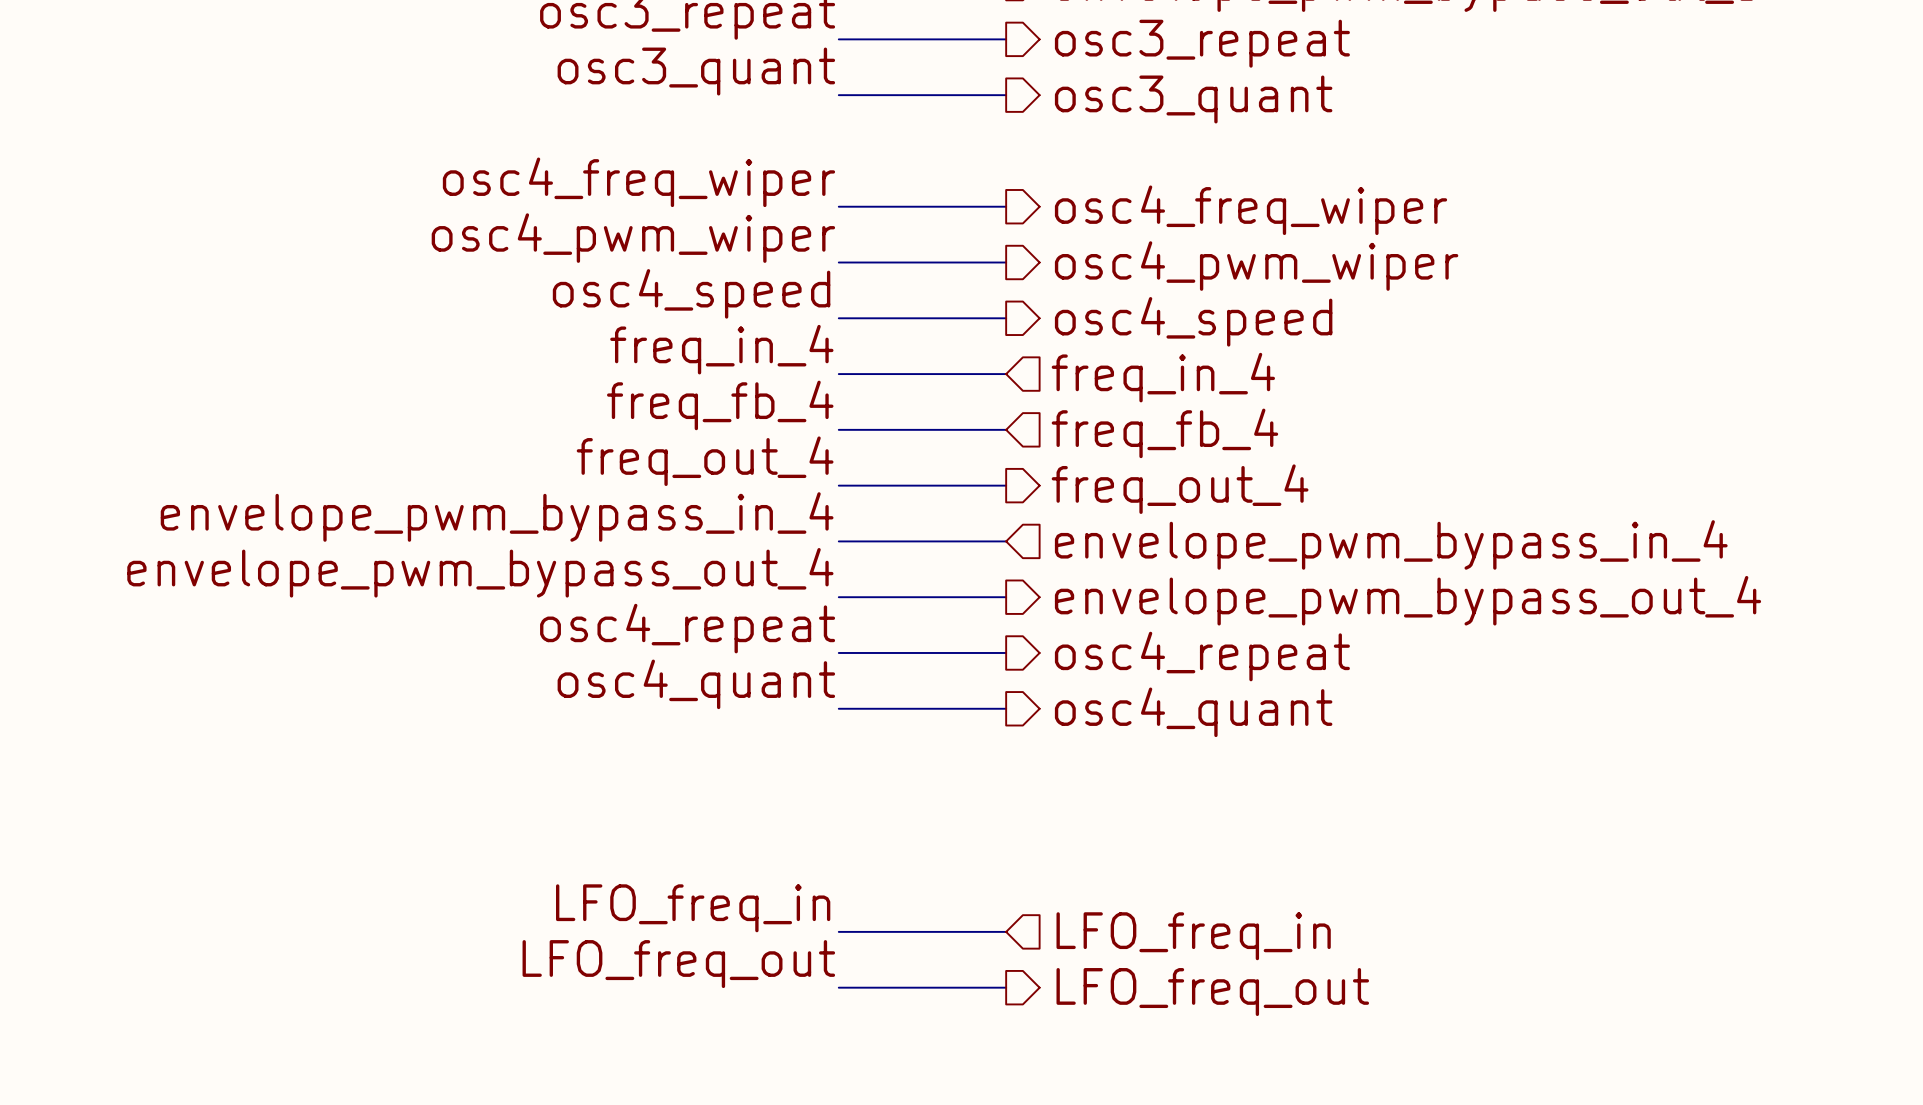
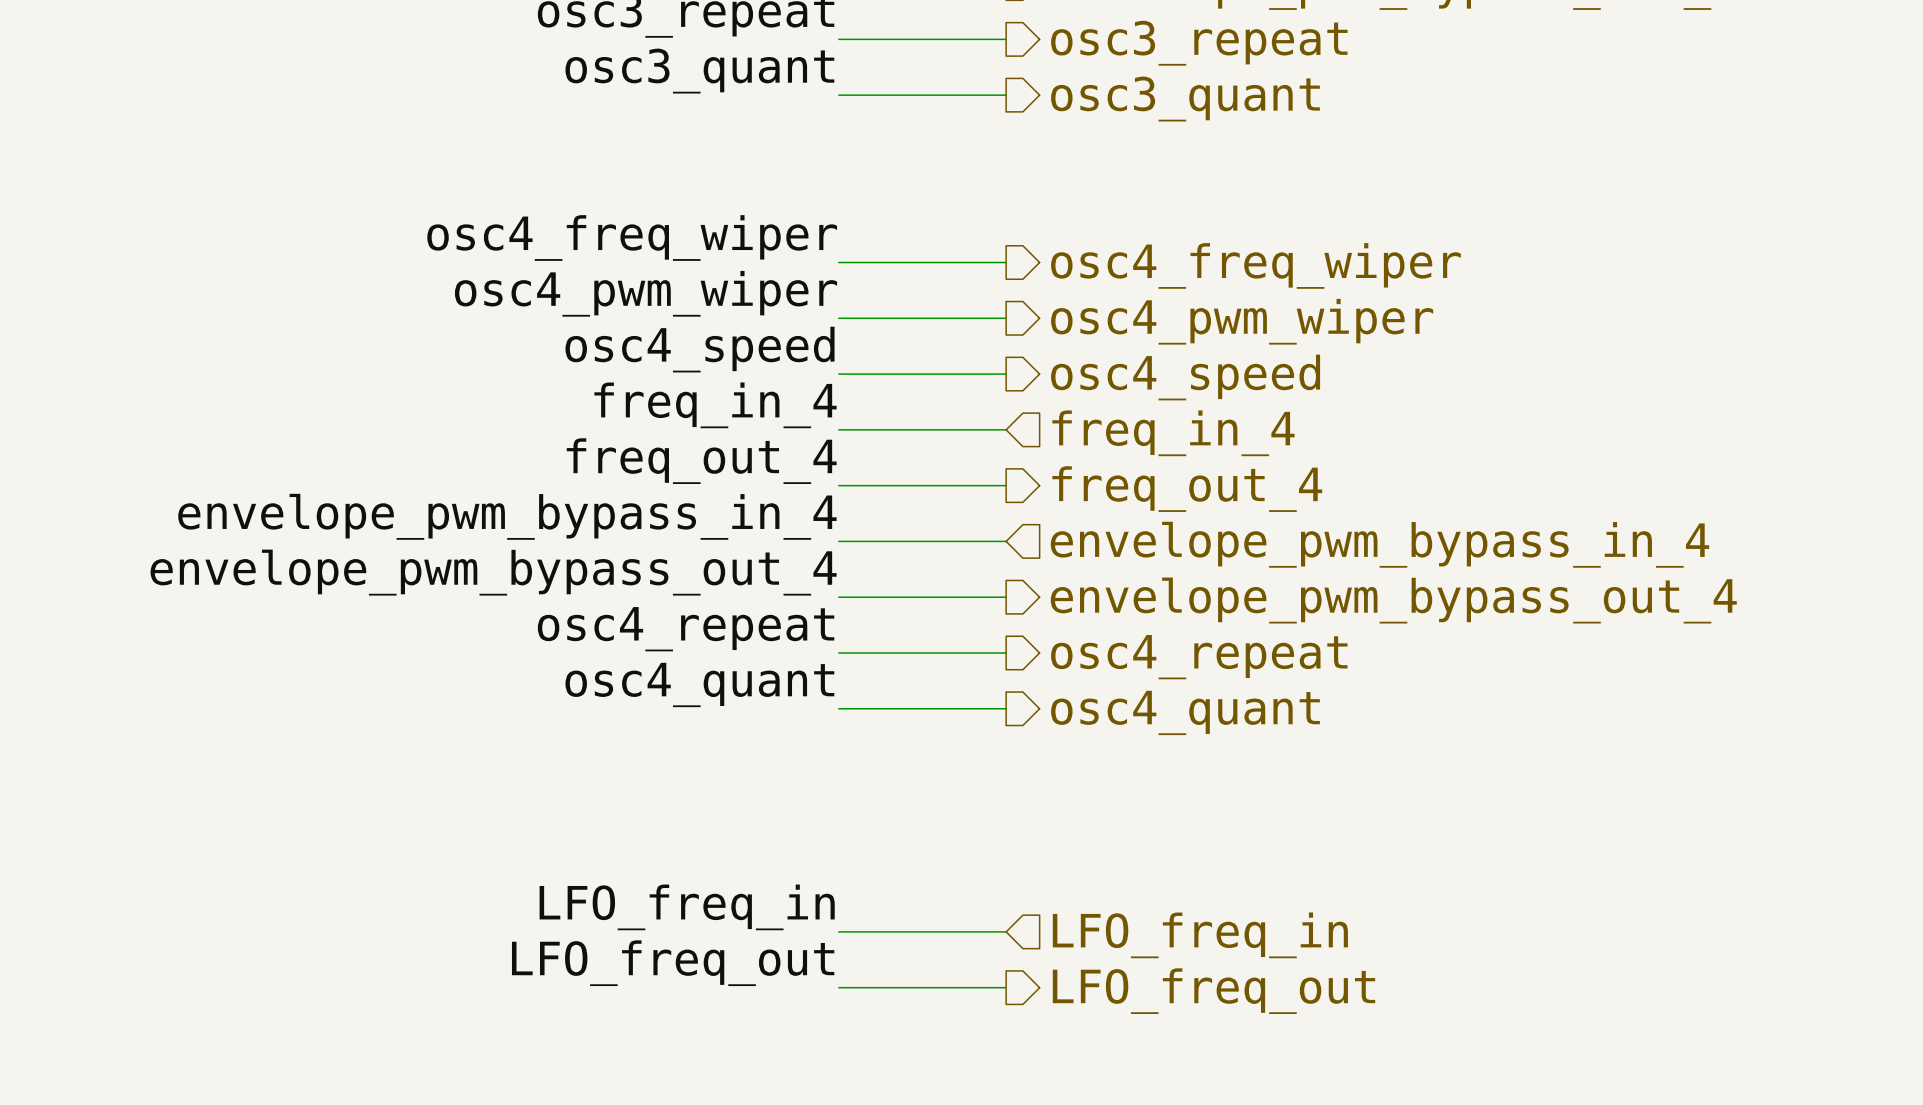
label: osc4_freq_wiper (638, 182) -> none
wire: (838, 206) (1006, 206) -> none
hierarchical label: osc4_freq_wiper (1251, 210) -> none
label: osc4_pwm_wiper (633, 238) -> osc4_freq_wiper (632, 238)
hierarchical label: osc4_pwm_wiper (1256, 266) -> osc4_freq_wiper (1255, 265)
label: osc4_speed (691, 293) -> osc4_pwm_wiper (645, 293)
hierarchical label: osc4_speed (1193, 321) -> osc4_pwm_wiper (1242, 321)
label: freq_in_4 (721, 349) -> osc4_speed (700, 349)
hierarchical label shape: input (1163, 377) -> output (1185, 377)
hierarchical label: freq_in_4 (1163, 377) -> osc4_speed (1185, 377)
label: freq_fb_4 (720, 405) -> freq_in_4 (715, 405)
hierarchical label: freq_fb_4 (1164, 433) -> freq_in_4 (1173, 433)

